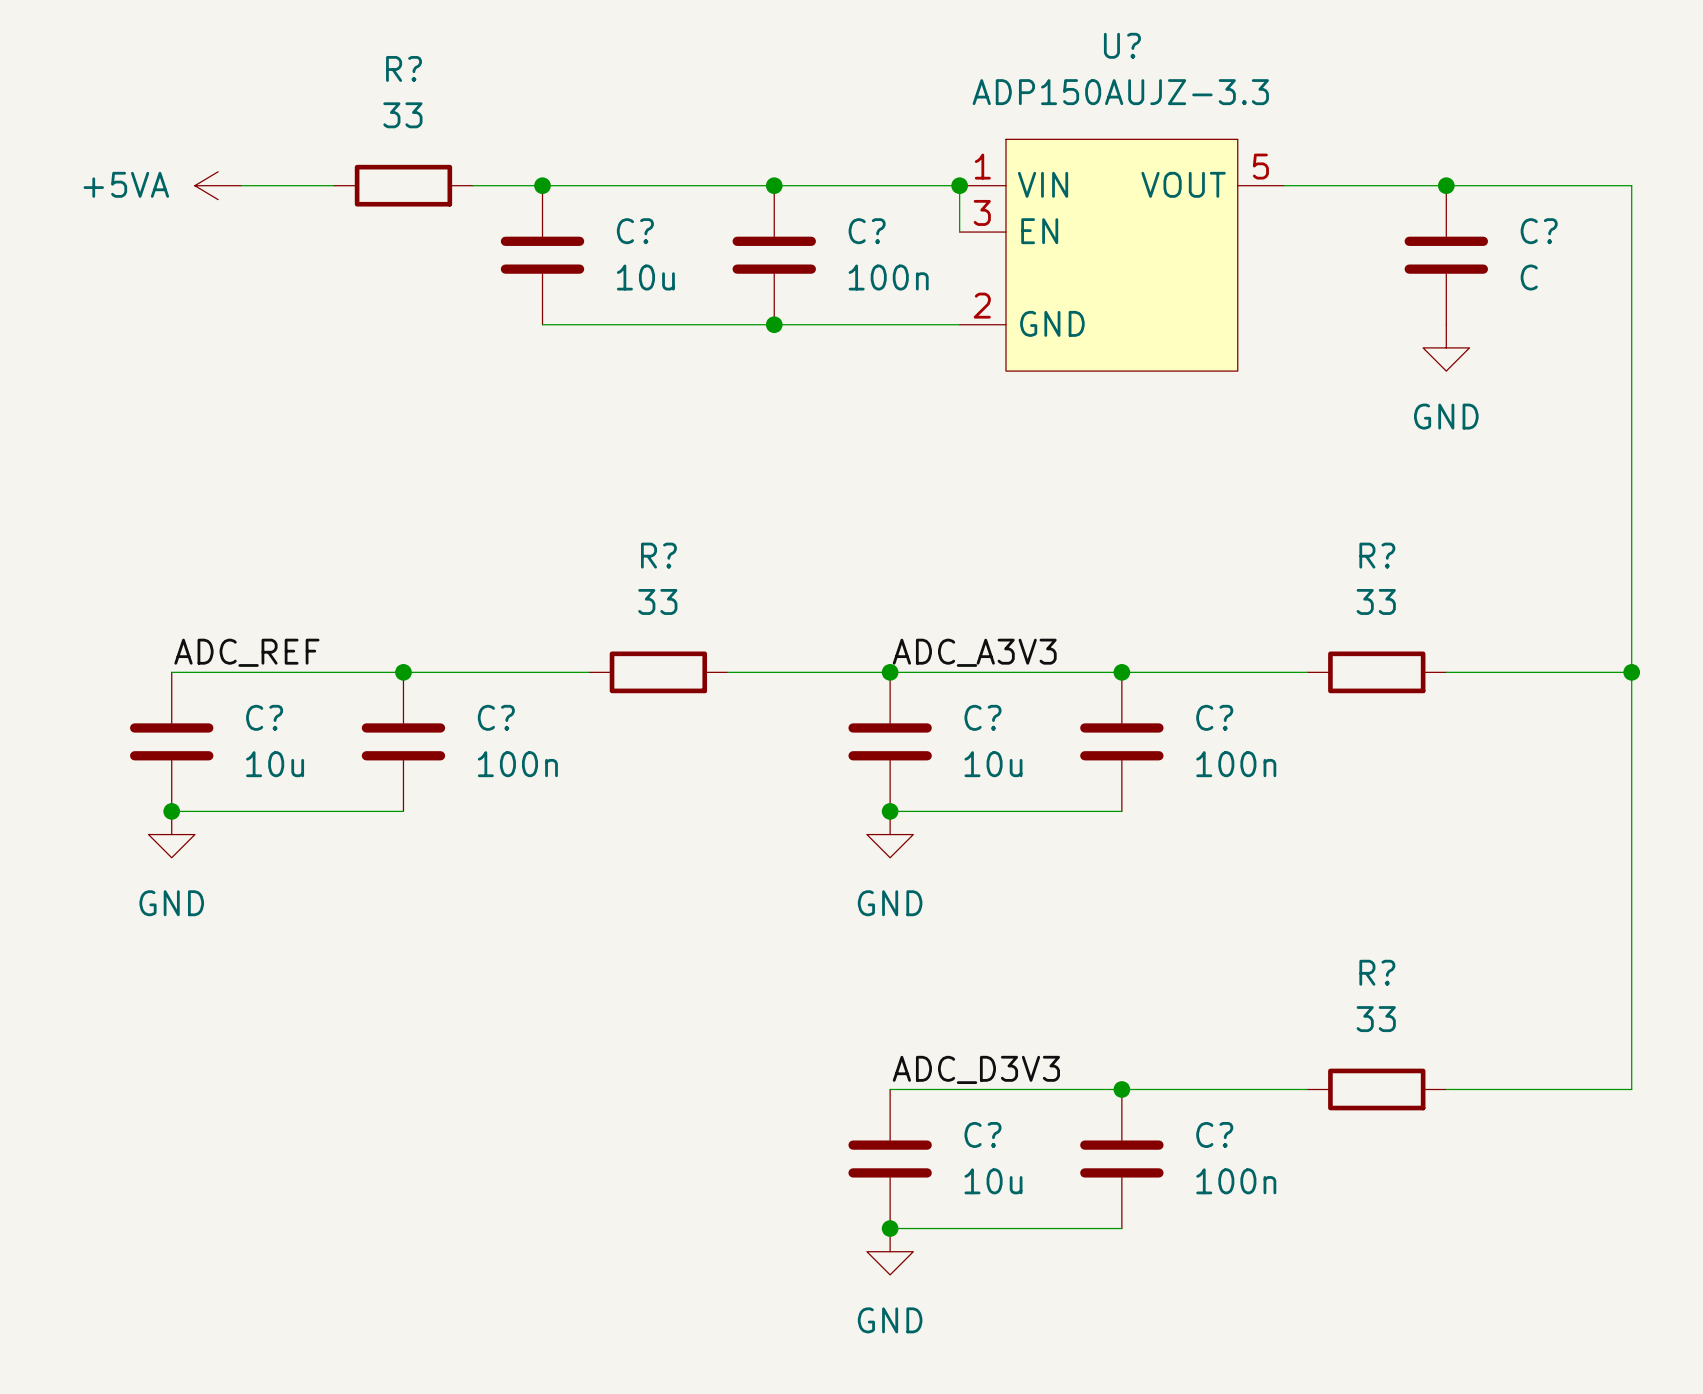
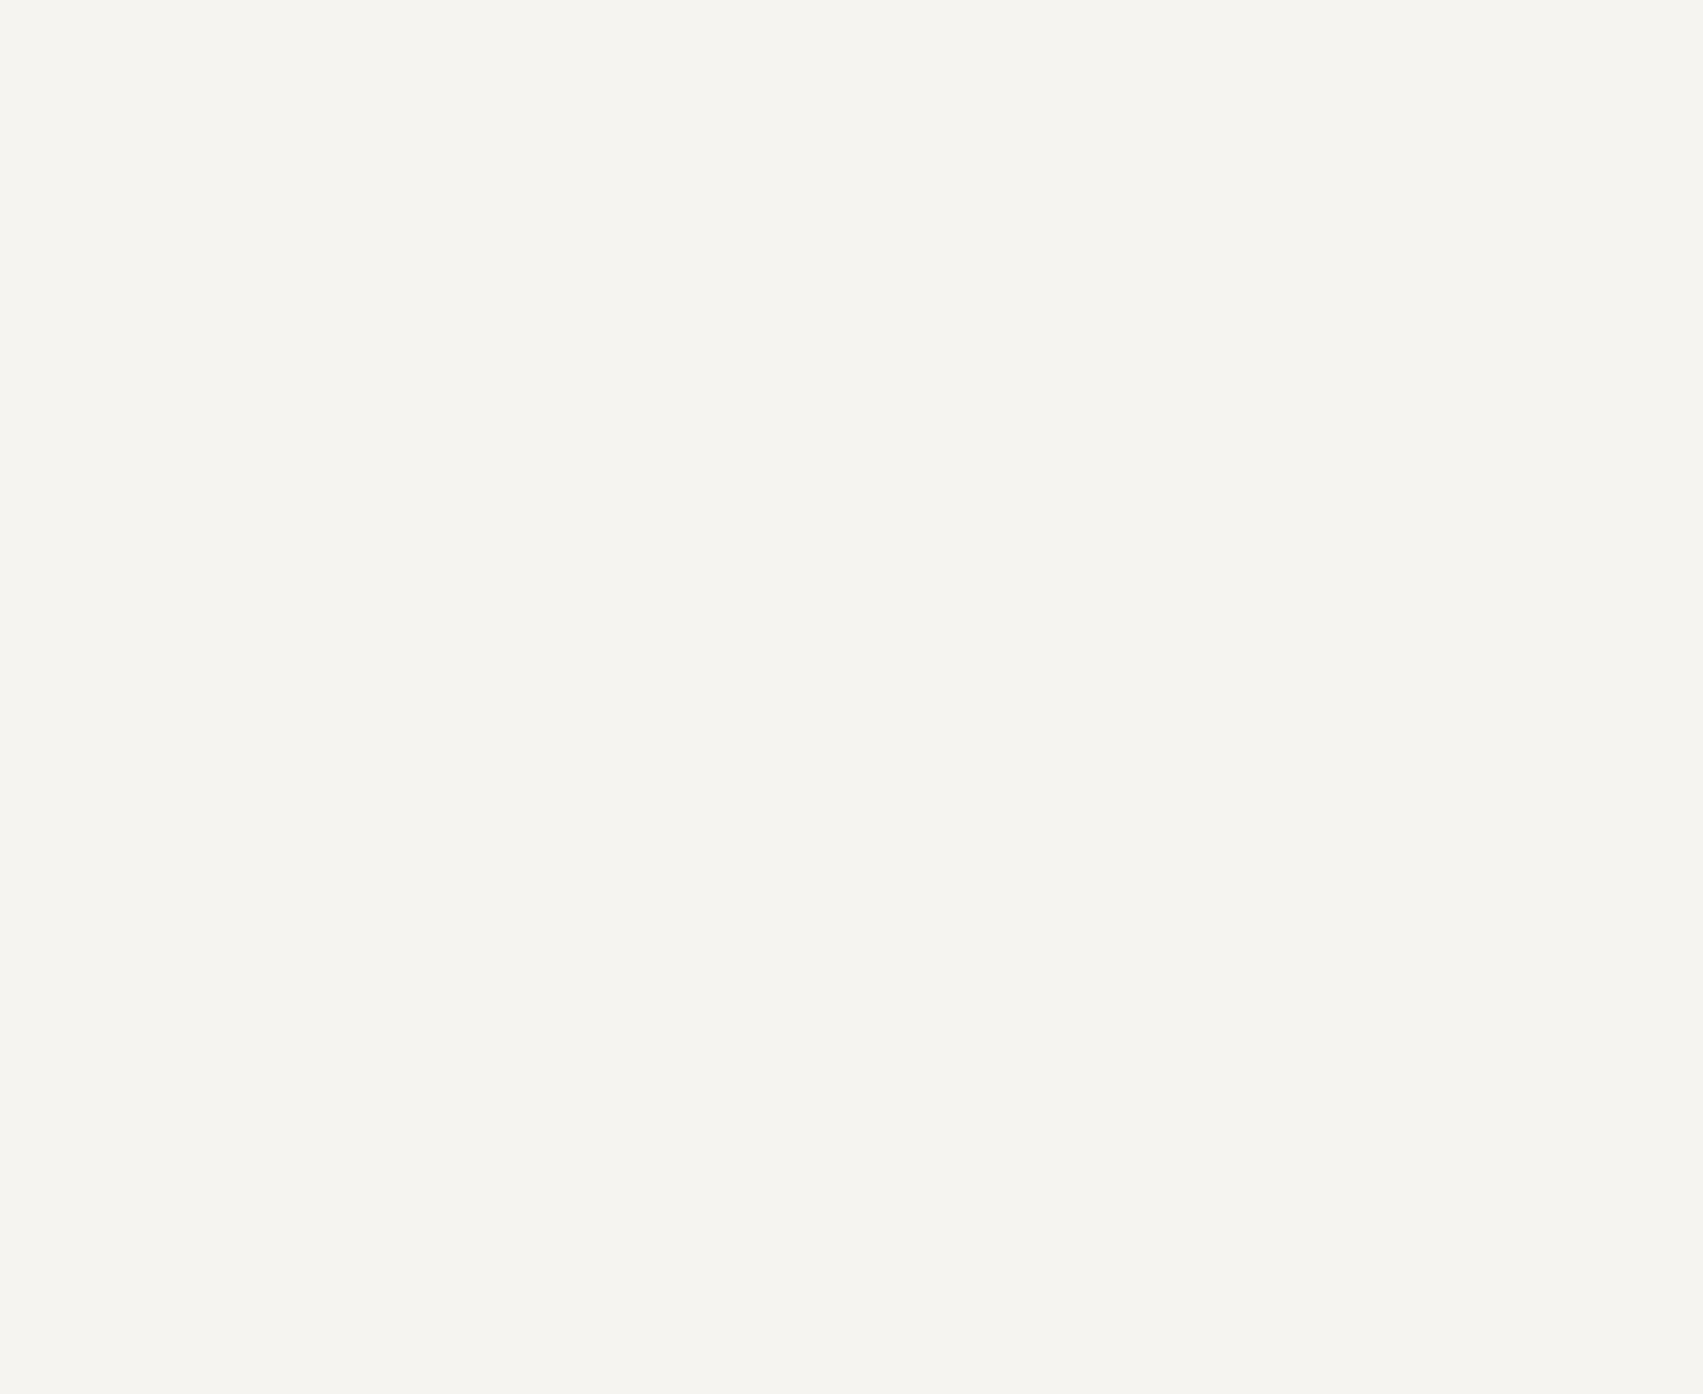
power symbol: +5VA (218, 185) -> none
wire: (241, 185) (333, 185) -> none
R?: 33 (403, 185) -> none
wire: (472, 185) (959, 185) (959, 232) -> none
junction: (542, 185) -> none
junction: (774, 185) -> none
junction: (959, 185) -> none
wire: (1284, 185) (1631, 185) (1631, 1089) (1446, 1089) -> none
junction: (1446, 185) -> none
C?: 10u (542, 255) -> none
C?: 100n (774, 255) -> none
U?: ADP150AUJZ-3.3 (1121, 255) -> none
C?: C (1446, 255) -> none
wire: (542, 324) (959, 324) -> none
junction: (774, 324) -> none
power symbol: GND (1446, 347) -> none
label: ADC_REF (246, 652) -> none
label: ADC_A3V3 (974, 652) -> none
wire: (171, 672) (588, 672) -> none
junction: (403, 672) -> none
R?: 33 (658, 672) -> none
wire: (727, 672) (1307, 672) -> none
junction: (890, 672) -> none
junction: (1121, 672) -> none
R?: 33 (1376, 672) -> none
wire: (1446, 672) (1631, 672) -> none
junction: (1631, 672) -> none
C?: 10u (171, 741) -> none
C?: 100n (403, 741) -> none
C?: 10u (890, 741) -> none
C?: 100n (1121, 741) -> none
wire: (171, 811) (403, 811) -> none
junction: (171, 811) -> none
wire: (890, 811) (1121, 811) -> none
junction: (890, 811) -> none
power symbol: GND (171, 834) -> none
power symbol: GND (890, 834) -> none
label: ADC_D3V3 (976, 1069) -> none
wire: (890, 1089) (1307, 1089) -> none
junction: (1121, 1089) -> none
R?: 33 (1376, 1089) -> none
C?: 10u (890, 1159) -> none
C?: 100n (1121, 1159) -> none
wire: (890, 1228) (1121, 1228) -> none
junction: (890, 1228) -> none
power symbol: GND (890, 1251) -> none

